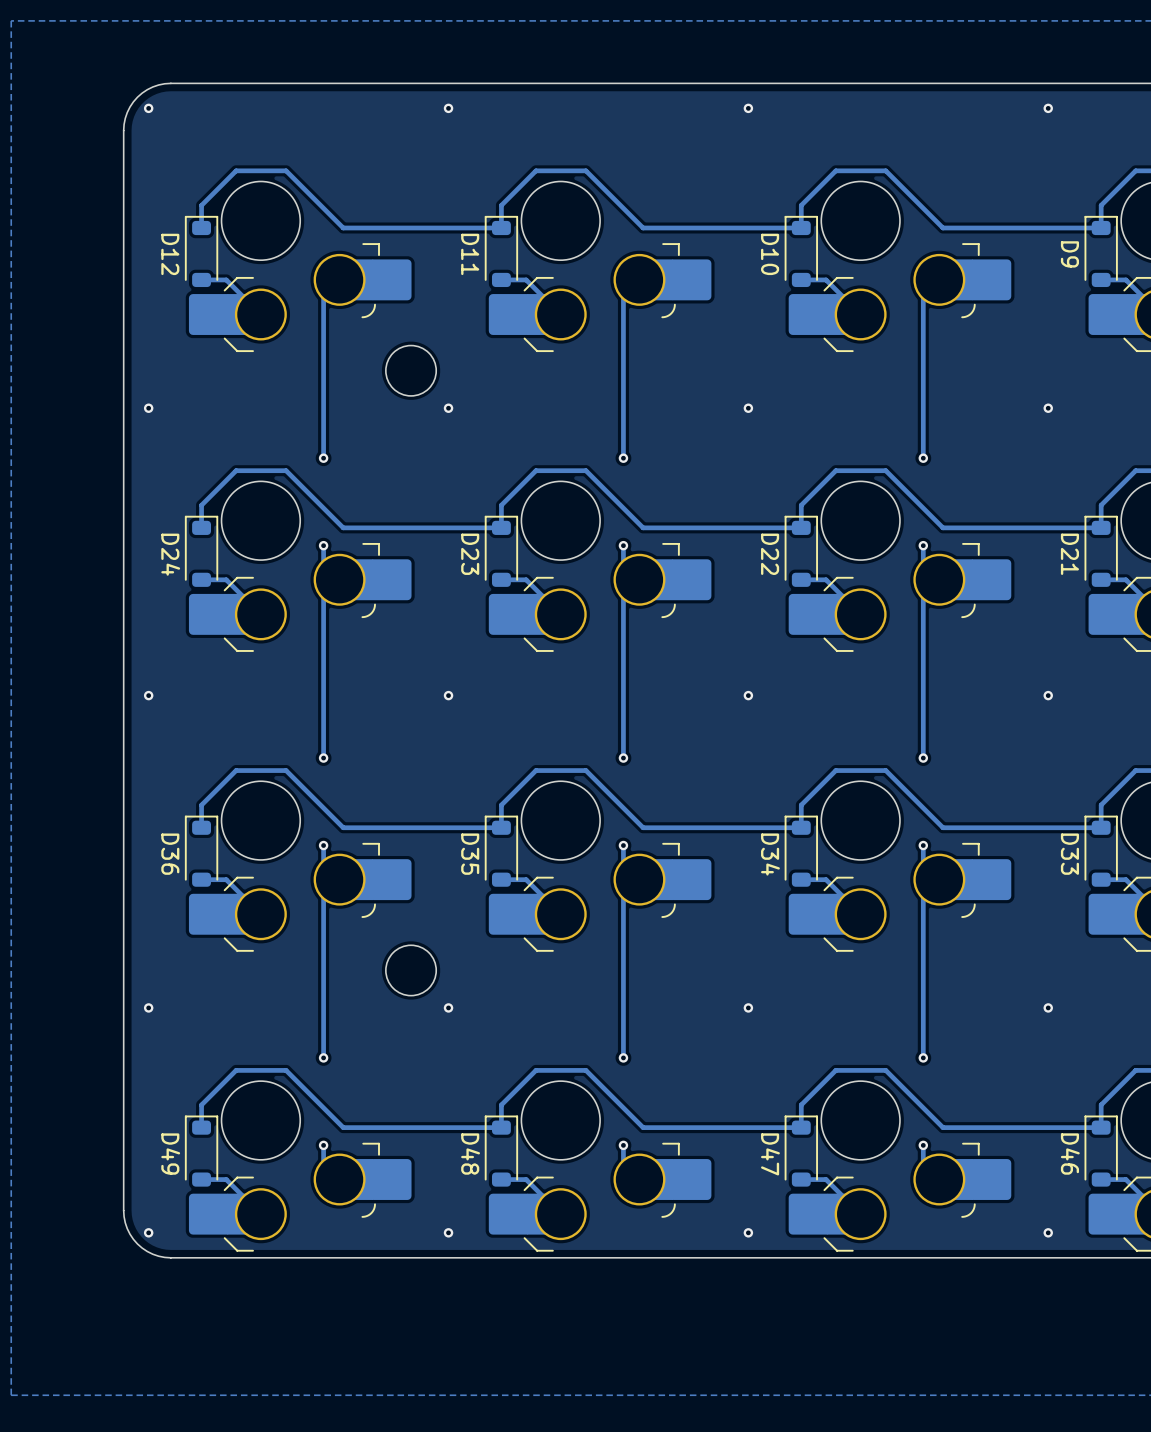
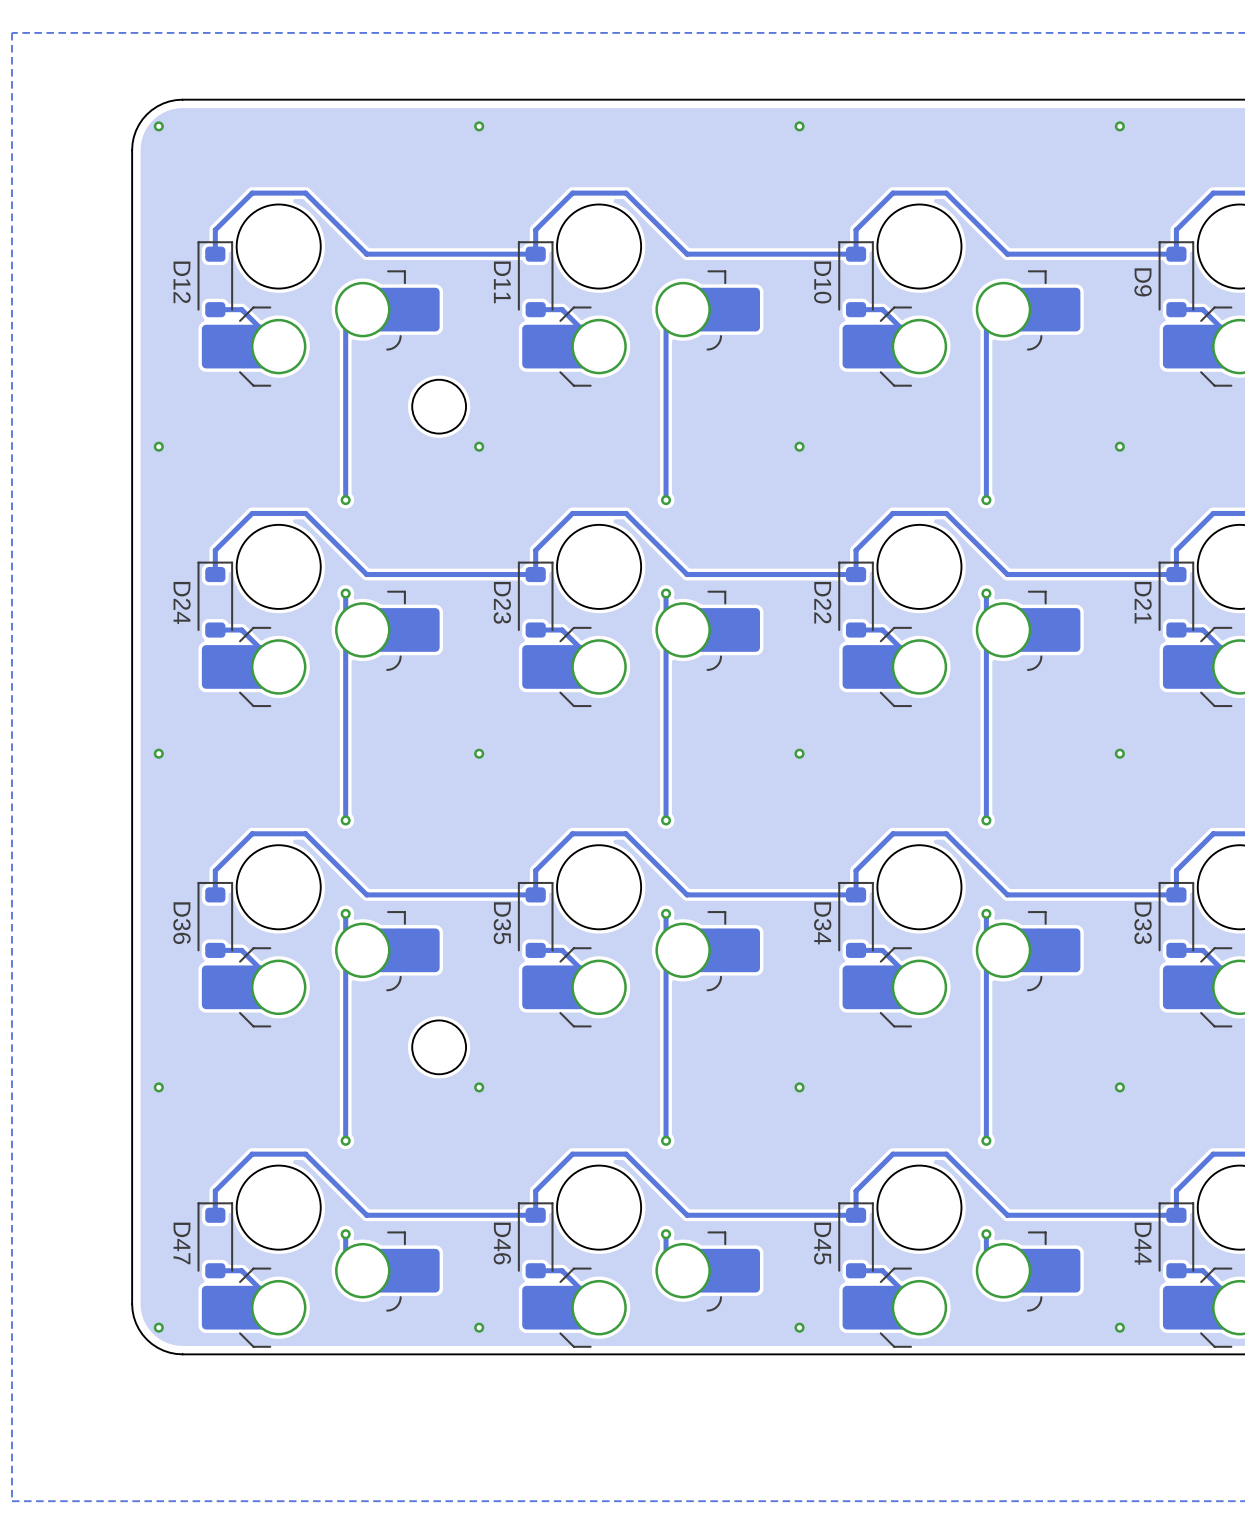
D49 name: D49 (170, 1154) -> D47 (181, 1243)
D48 name: D48 (470, 1154) -> D46 (502, 1243)
D47 name: D47 (770, 1154) -> D45 (822, 1243)
D46 name: D46 (1070, 1154) -> D44 (1143, 1243)

